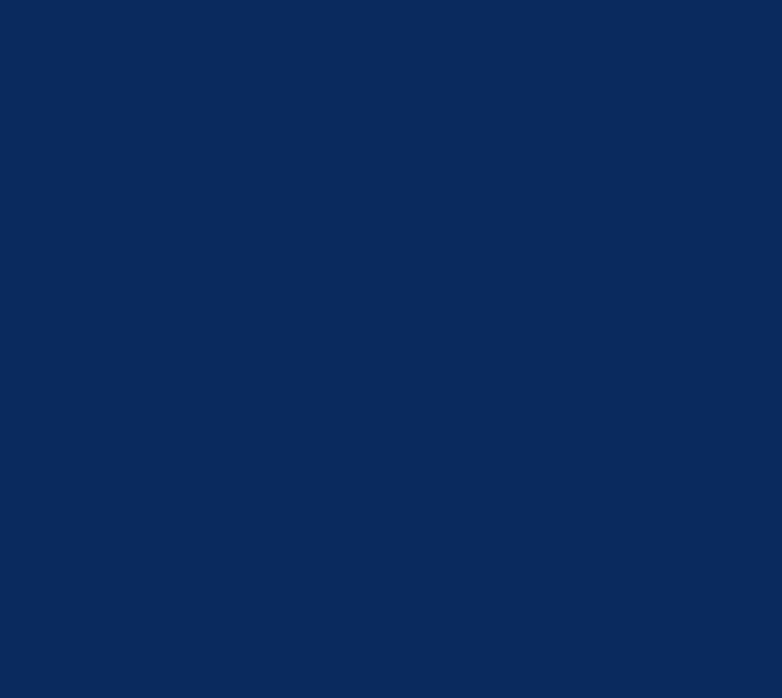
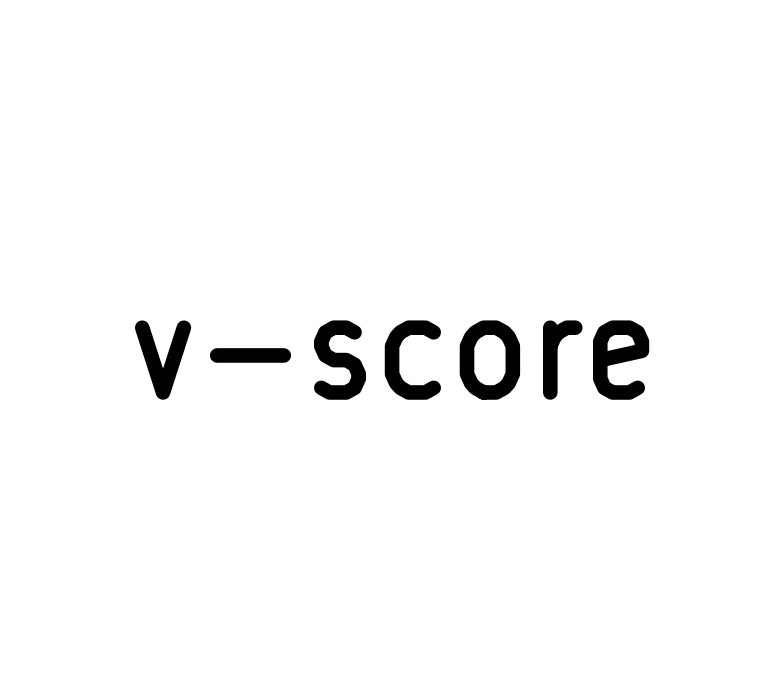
text: none -> v-score (392, 360)

